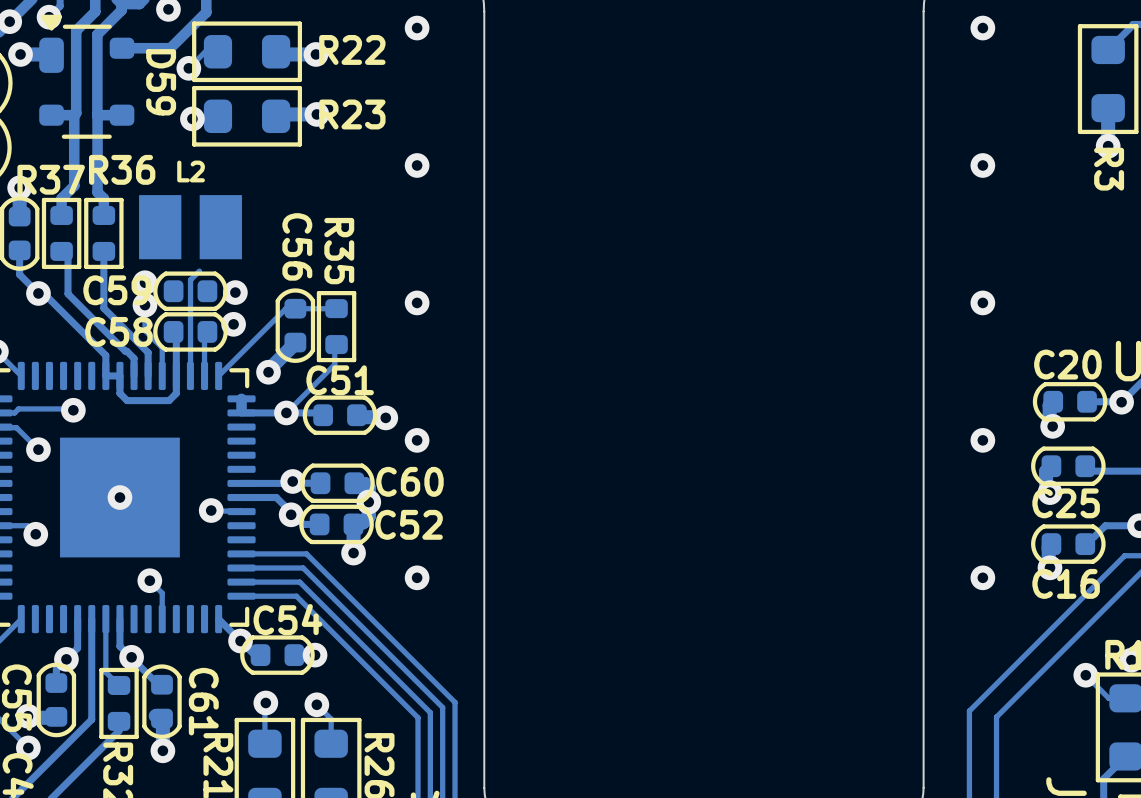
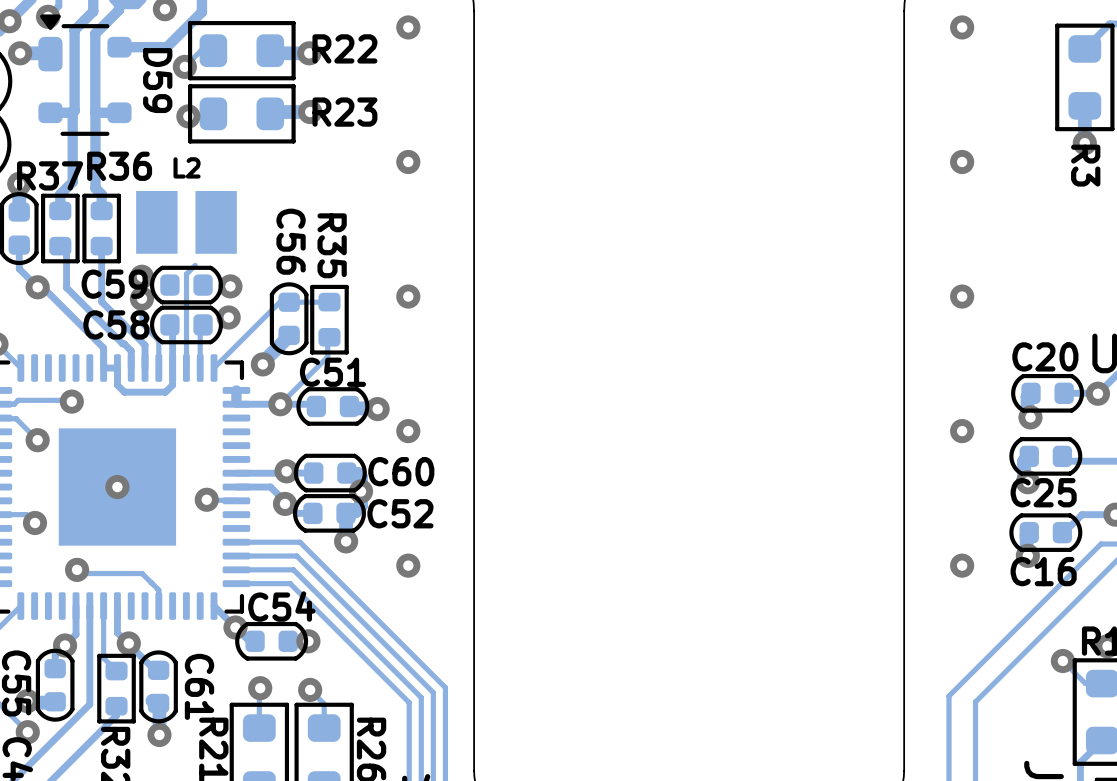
track: (149, 580) (162, 593) (162, 602) -> (77, 569) (80, 573) (142, 573) (158, 590)
via position: (149, 580) -> (77, 569)

